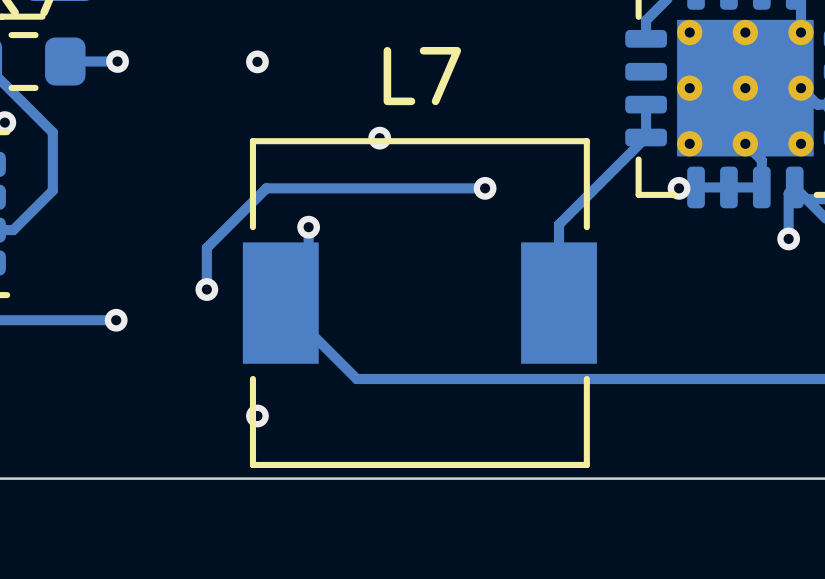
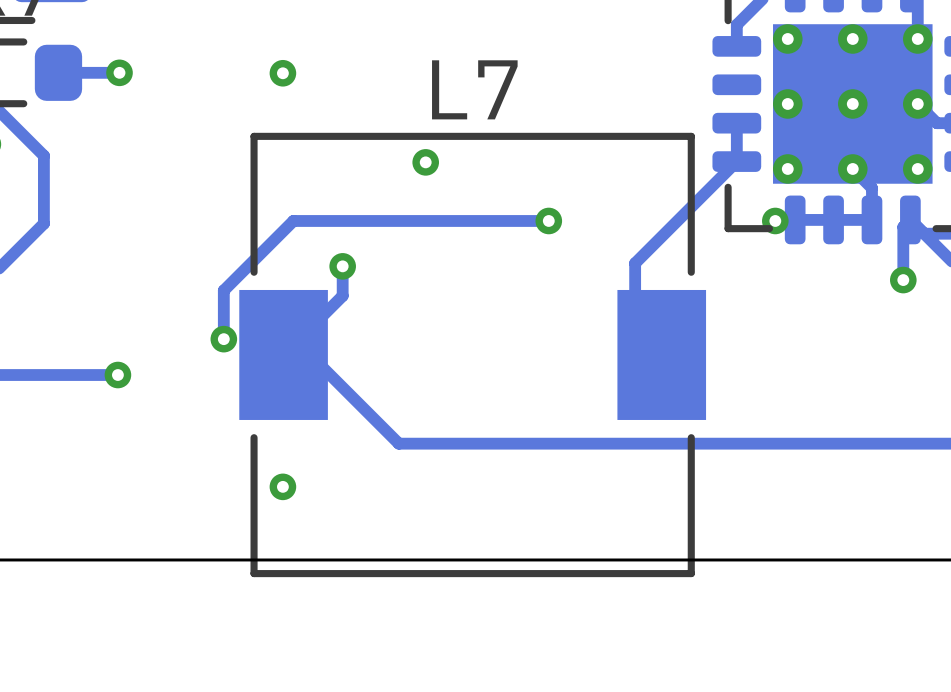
L7 footprint: [242, 138, 597, 468] -> [239, 132, 707, 578]

